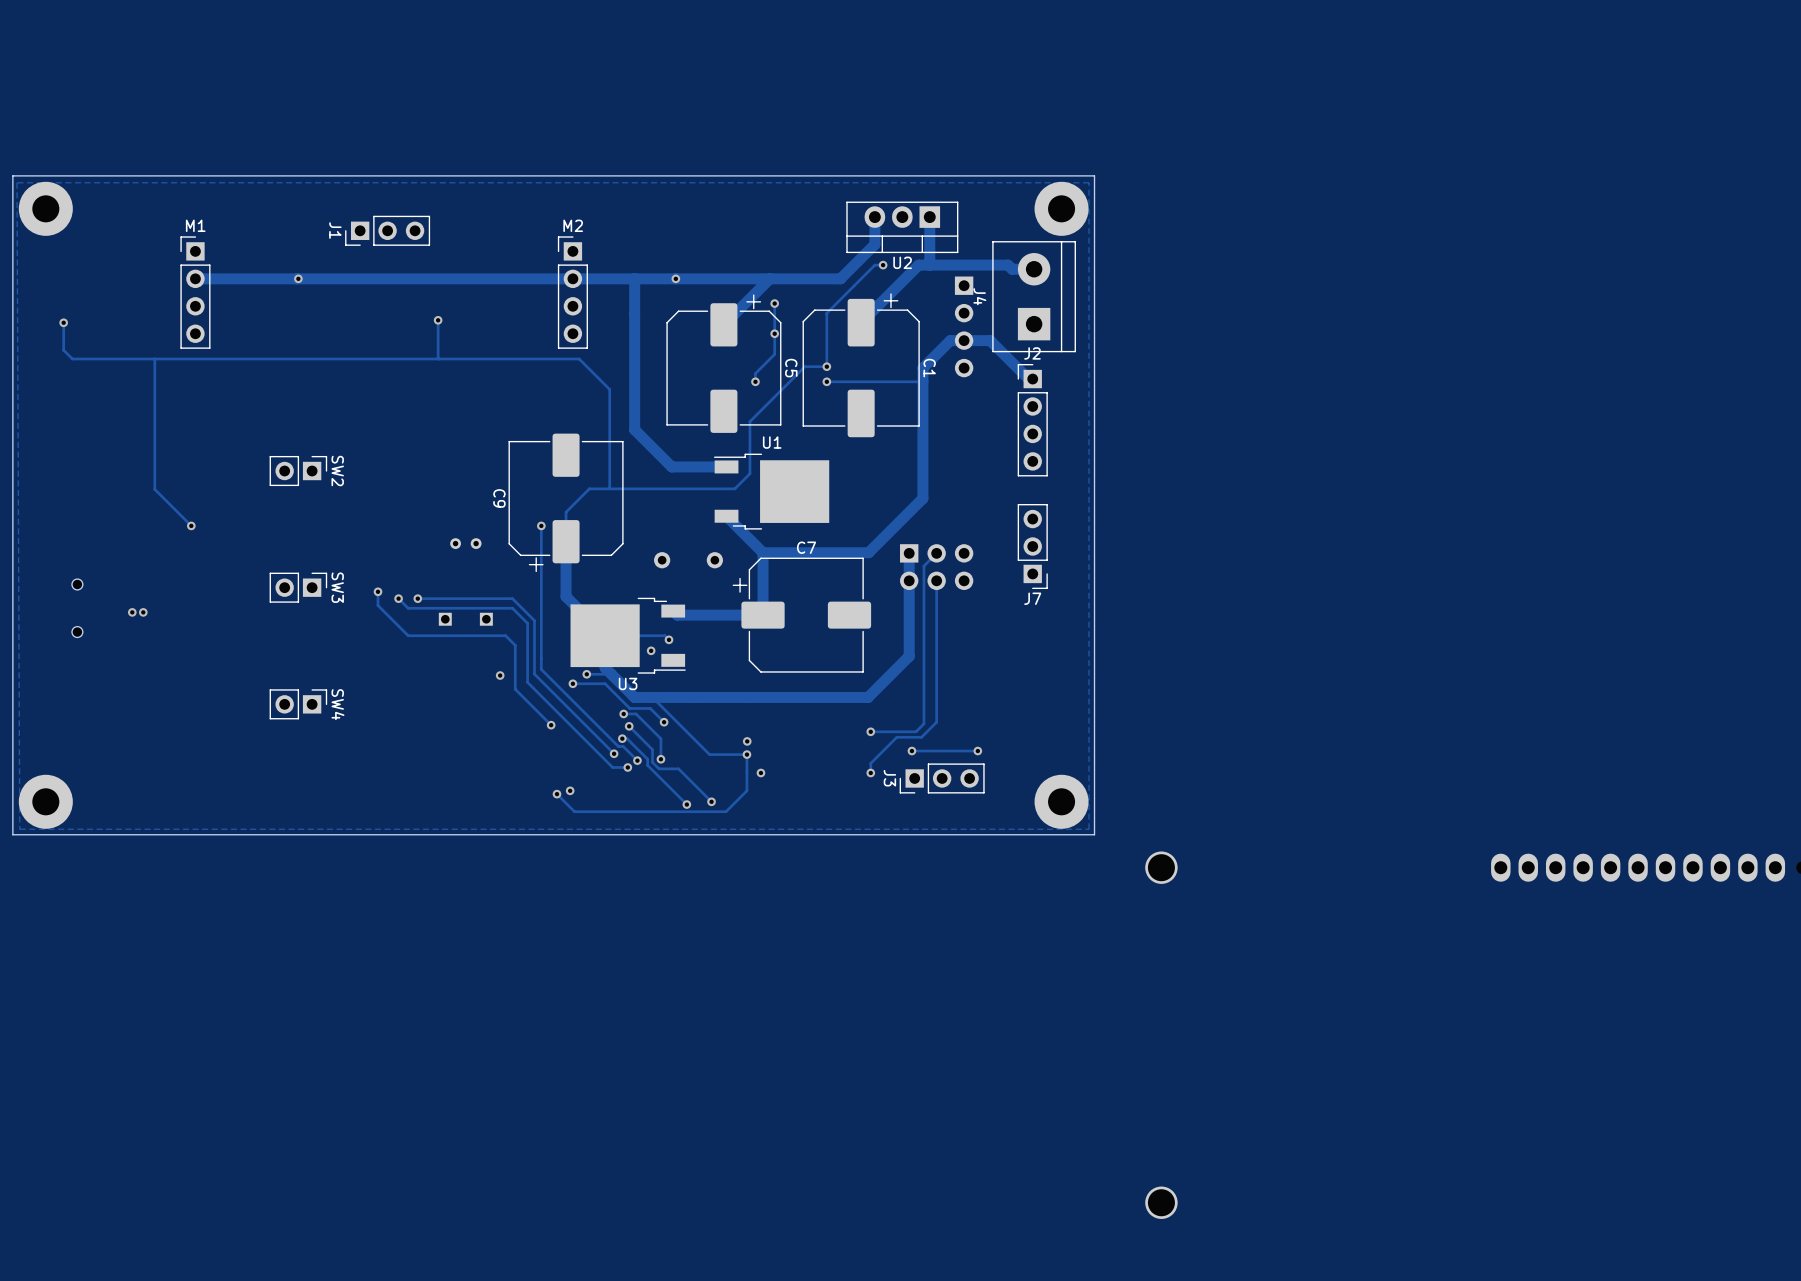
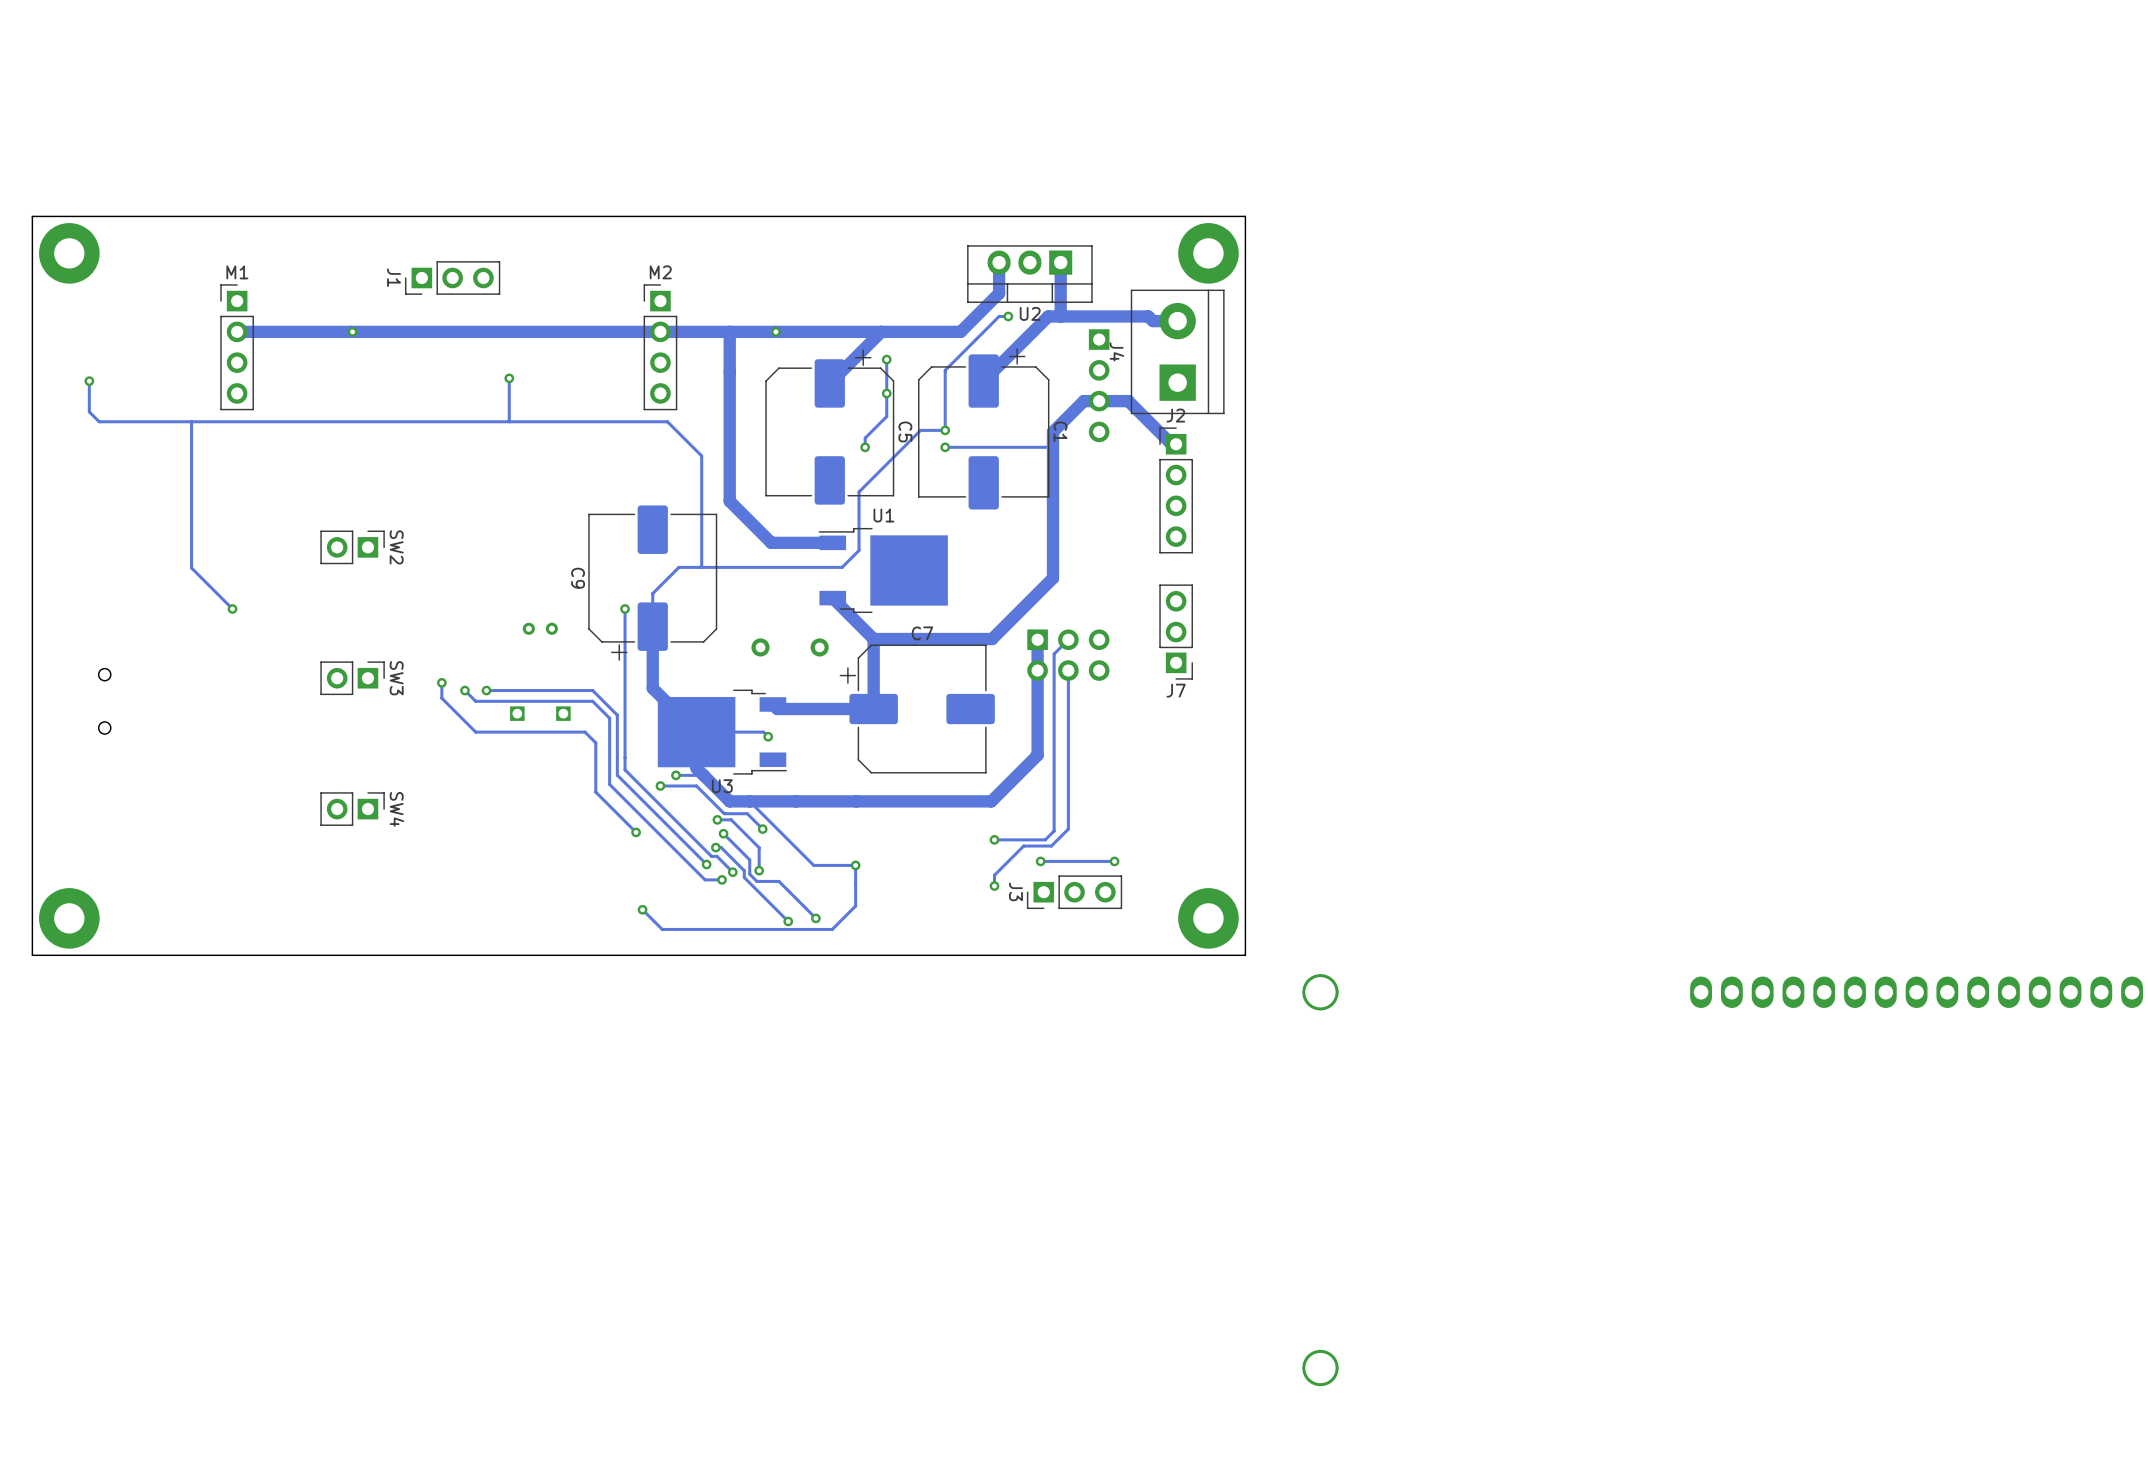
zone outline: (1089, 182) (1089, 829) (19, 829) (17, 182) (1089, 182) -> none
via: (132, 612) -> none
via: (143, 612) -> none
via: (651, 650) -> none
via: (500, 675) -> none
via: (747, 741) -> none
via: (760, 772) -> none
via: (570, 790) -> none

